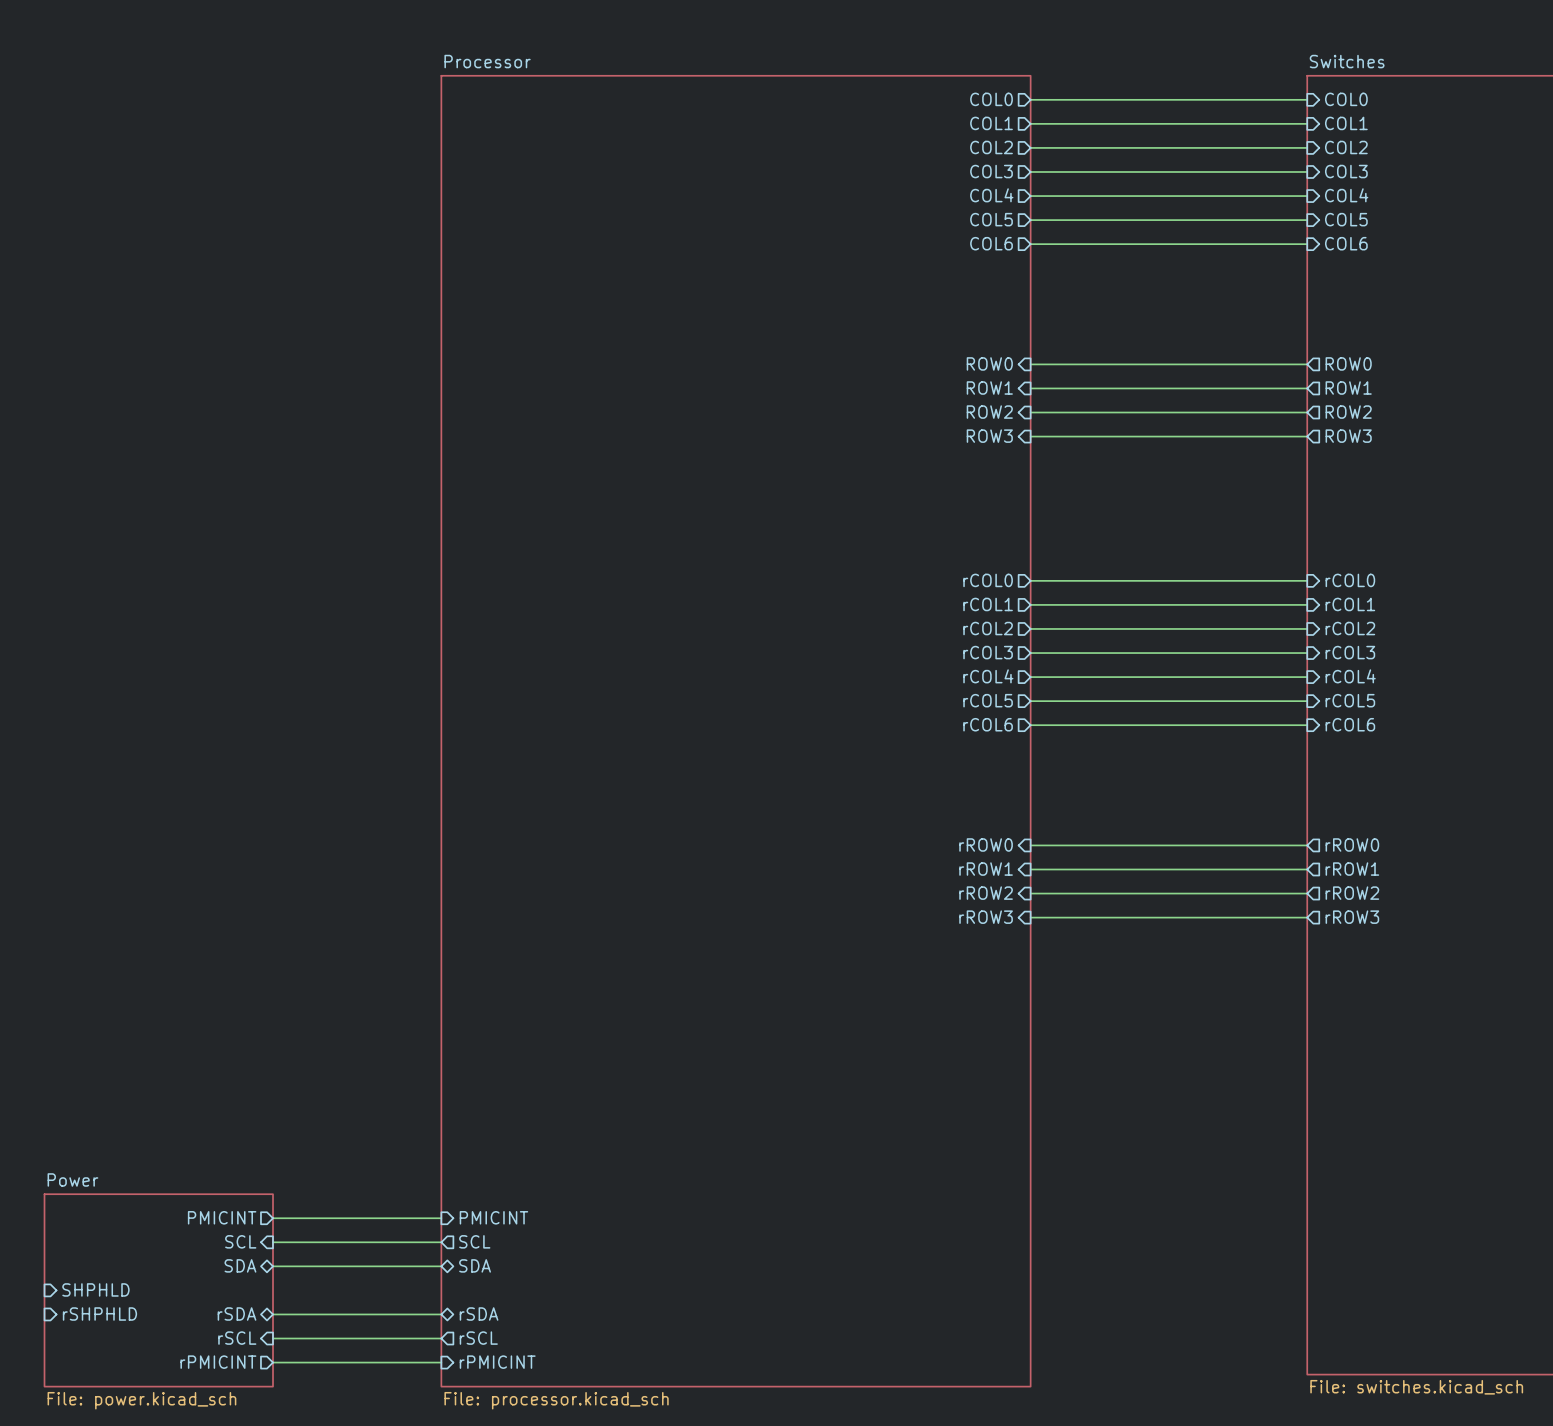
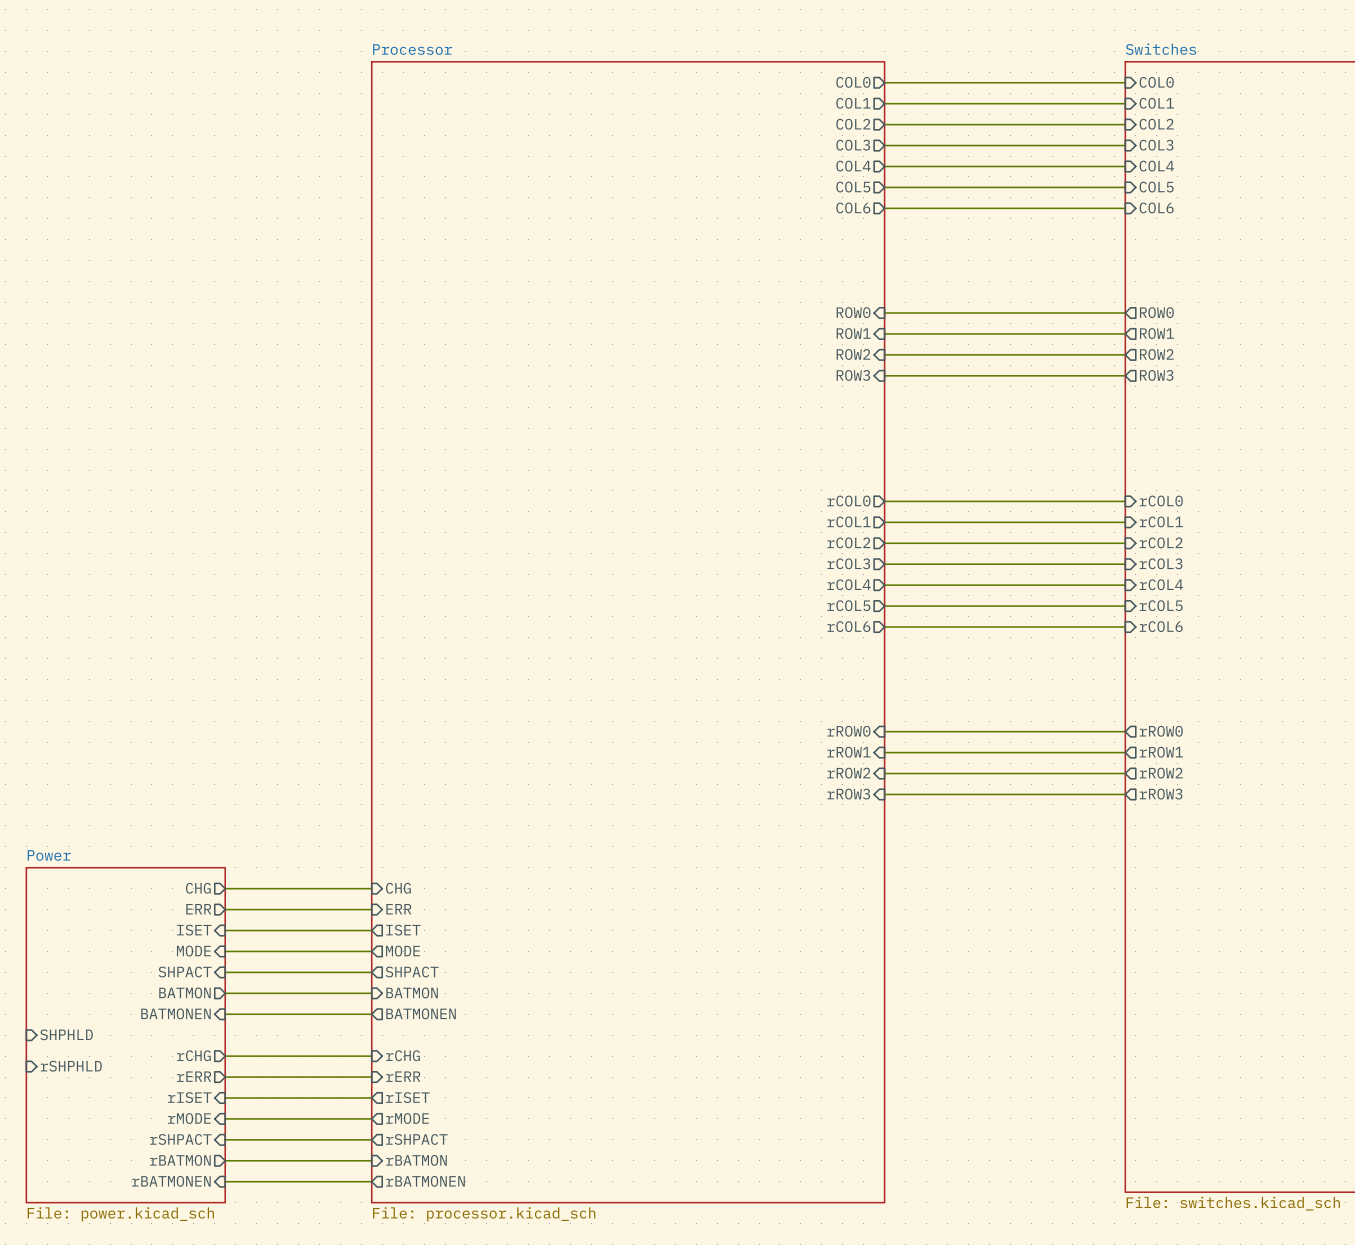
sheet pin: none -> CHG (198, 888)
wire: none -> (225, 888) (371, 888)
sheet pin: none -> CHG (398, 888)
sheet pin: none -> ERR (198, 909)
wire: none -> (225, 909) (371, 909)
sheet pin: none -> ERR (398, 909)
sheet pin: none -> ISET (194, 930)
wire: none -> (225, 930) (371, 930)
sheet pin: none -> ISET (403, 930)
sheet pin: none -> MODE (193, 951)
wire: none -> (225, 951) (371, 951)
sheet pin: none -> MODE (402, 951)
sheet pin: none -> SHPACT (185, 972)
sheet pin: none -> SHPACT (412, 972)
wire: none -> (225, 972) (371, 972)
sheet pin: none -> BATMON (184, 992)
sheet pin: none -> BATMON (412, 992)
wire: none -> (225, 993) (371, 993)
sheet pin: none -> BATMONEN (175, 1013)
sheet pin: none -> BATMONEN (421, 1013)
wire: none -> (225, 1014) (371, 1014)
sheet Power: none -> File: power.kicad_sch (125, 1035)
sheet pin: PMICINT (222, 1217) -> rCHG (193, 1055)
sheet pin: PMICINT (493, 1217) -> rCHG (403, 1055)
sheet pin shape: input (240, 1241) -> output (194, 1076)
sheet pin: SCL (240, 1241) -> rERR (194, 1076)
sheet pin shape: output (474, 1241) -> input (403, 1076)
sheet pin: SCL (474, 1241) -> rERR (403, 1076)
sheet pin shape: bidirectional (240, 1265) -> input (189, 1097)
sheet pin: SDA (240, 1265) -> rISET (189, 1097)
sheet pin shape: bidirectional (475, 1265) -> output (407, 1097)
sheet pin: SDA (475, 1265) -> rISET (407, 1097)
sheet pin position: SHPHLD (95, 1289) -> SHPHLD (66, 1034)
sheet pin: none -> rMODE (189, 1118)
sheet pin: none -> rMODE (407, 1118)
sheet Power: File: power.kicad_sch (158, 1290) -> none
wire: none -> (225, 1118) (371, 1118)
sheet pin position: rSHPHLD (99, 1314) -> rSHPHLD (71, 1066)
sheet pin shape: bidirectional (237, 1314) -> input (180, 1139)
sheet pin: rSDA (237, 1314) -> rSHPACT (180, 1139)
sheet pin shape: bidirectional (479, 1314) -> output (416, 1139)
sheet pin: rSDA (479, 1314) -> rSHPACT (416, 1139)
sheet pin shape: input (237, 1338) -> output (180, 1160)
sheet pin: rSCL (237, 1338) -> rBATMON (180, 1160)
sheet pin shape: output (478, 1338) -> input (416, 1160)
sheet pin: rSCL (478, 1338) -> rBATMON (416, 1160)
sheet pin shape: output (218, 1362) -> input (171, 1181)
sheet pin: rPMICINT (218, 1362) -> rBATMONEN (171, 1181)
sheet pin shape: input (497, 1362) -> output (425, 1181)
sheet pin: rPMICINT (497, 1362) -> rBATMONEN (425, 1181)

